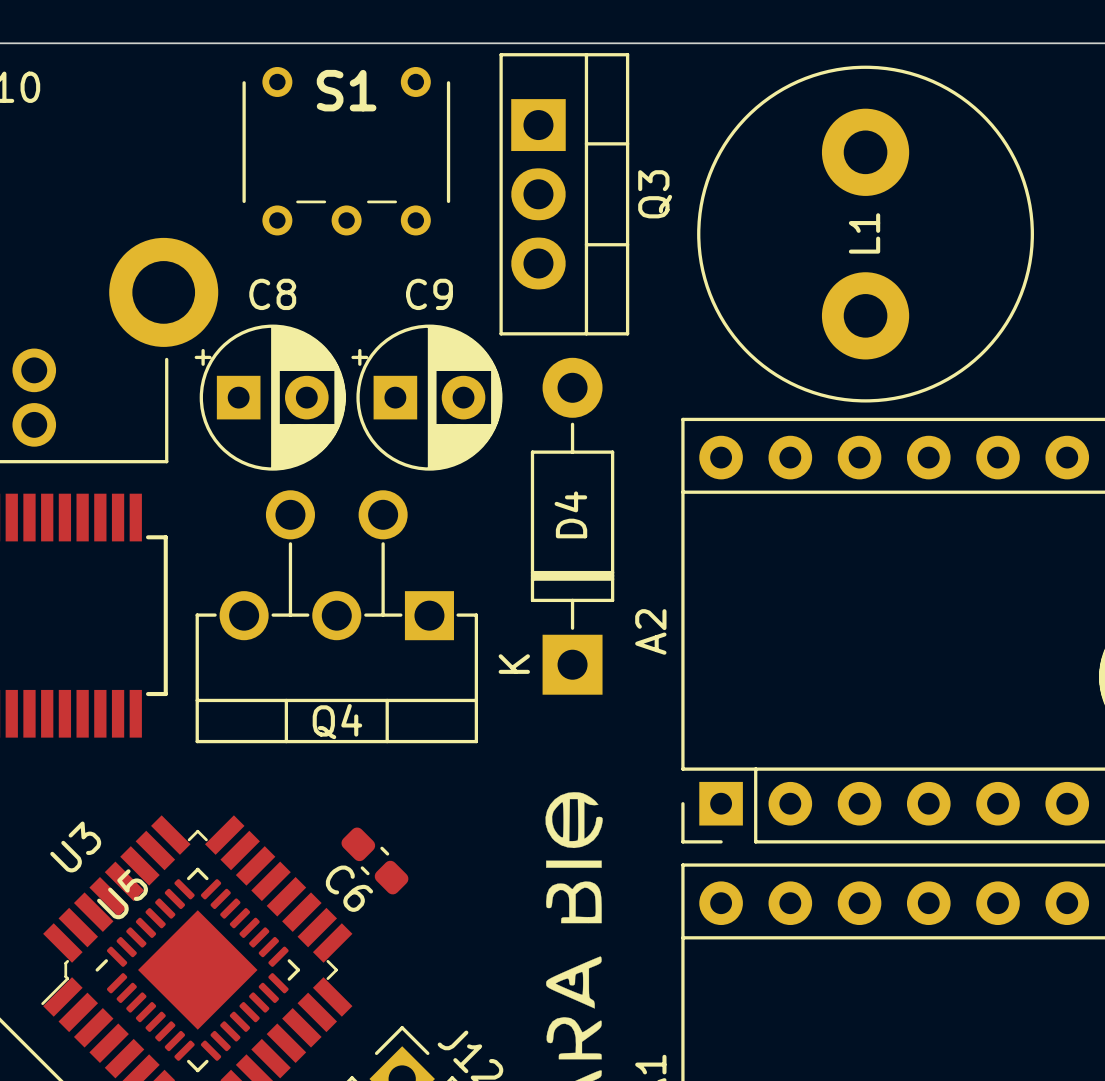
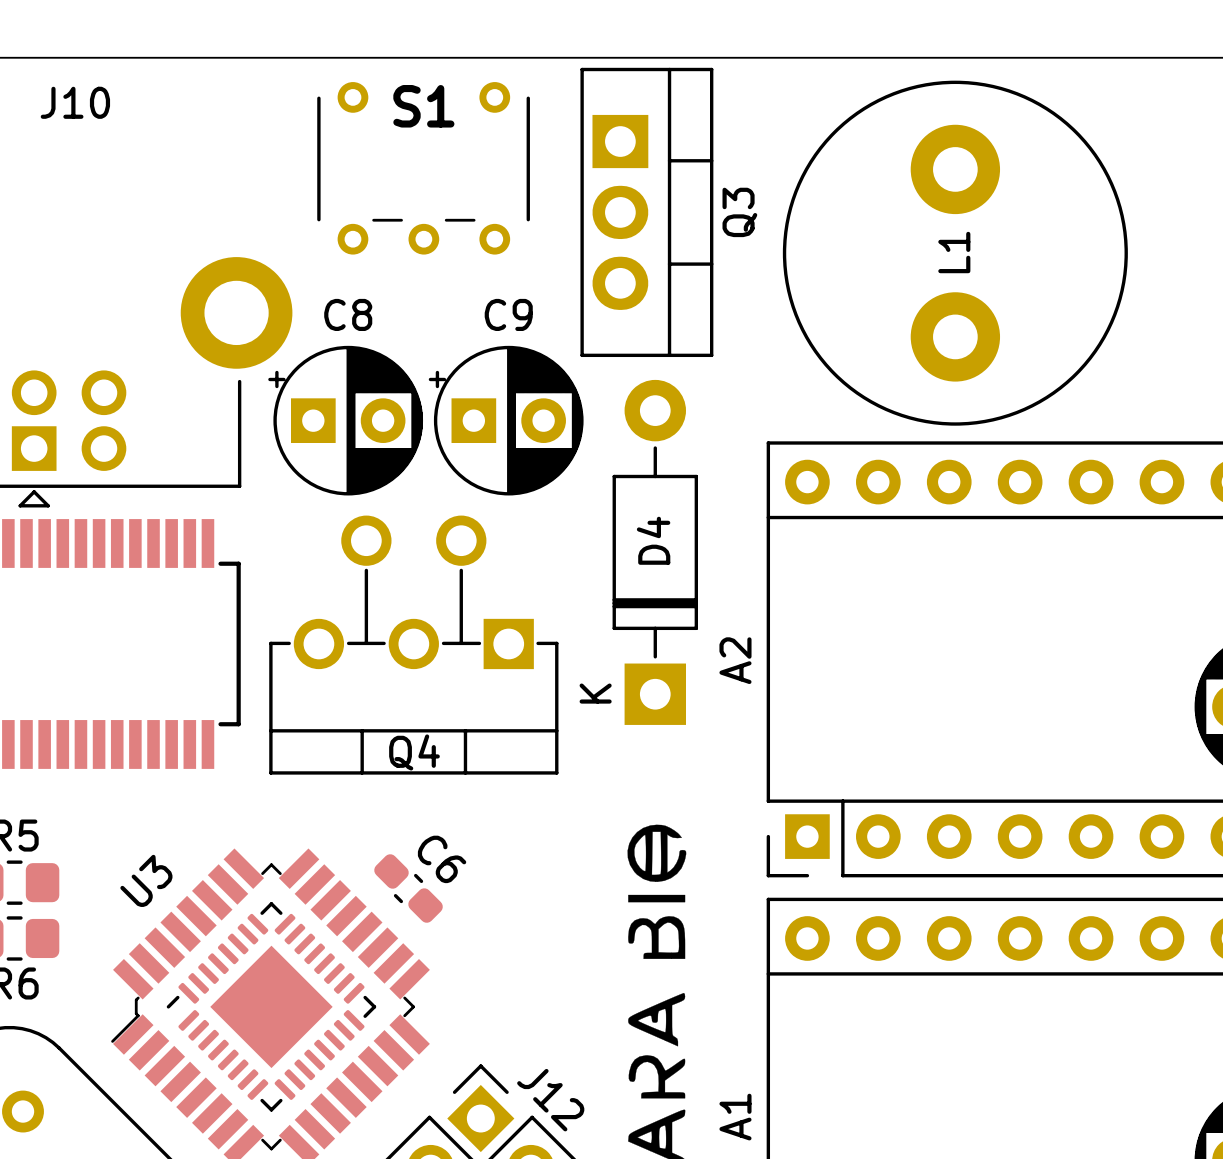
C6 position: (374, 860) -> (408, 888)
C6 name position: C6 (349, 888) -> C6 (442, 859)
U5 name: U5 (122, 894) -> none

